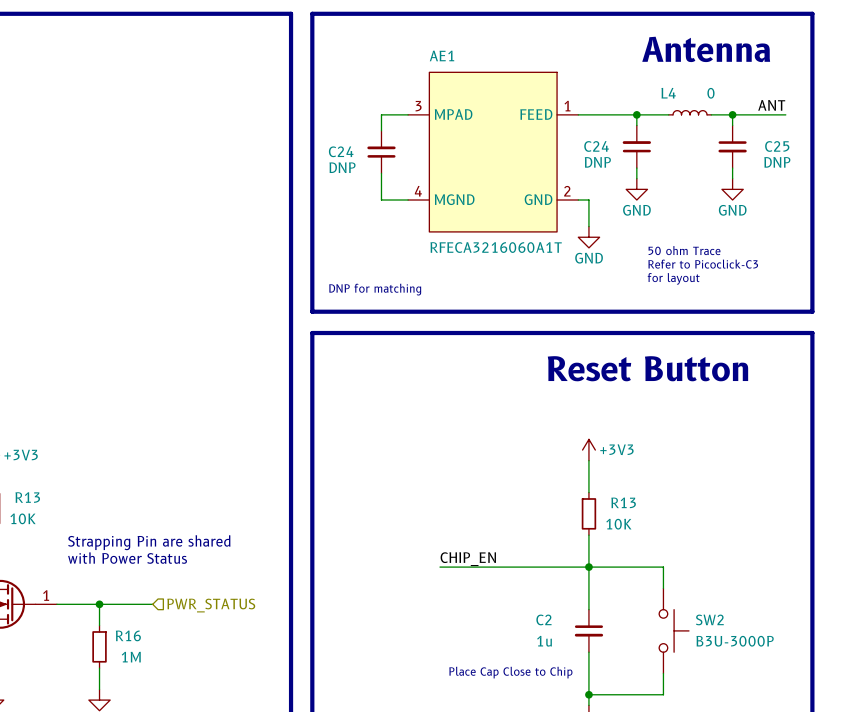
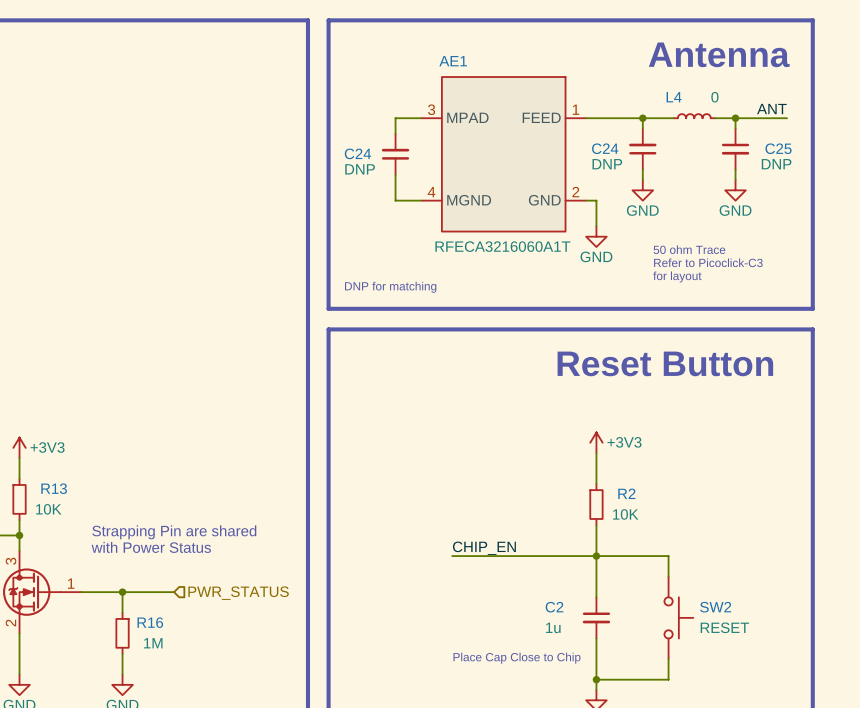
R13 name: R13 (623, 502) -> R2 (626, 493)
SW2 value: B3U-3000P (735, 641) -> RESET (724, 627)

